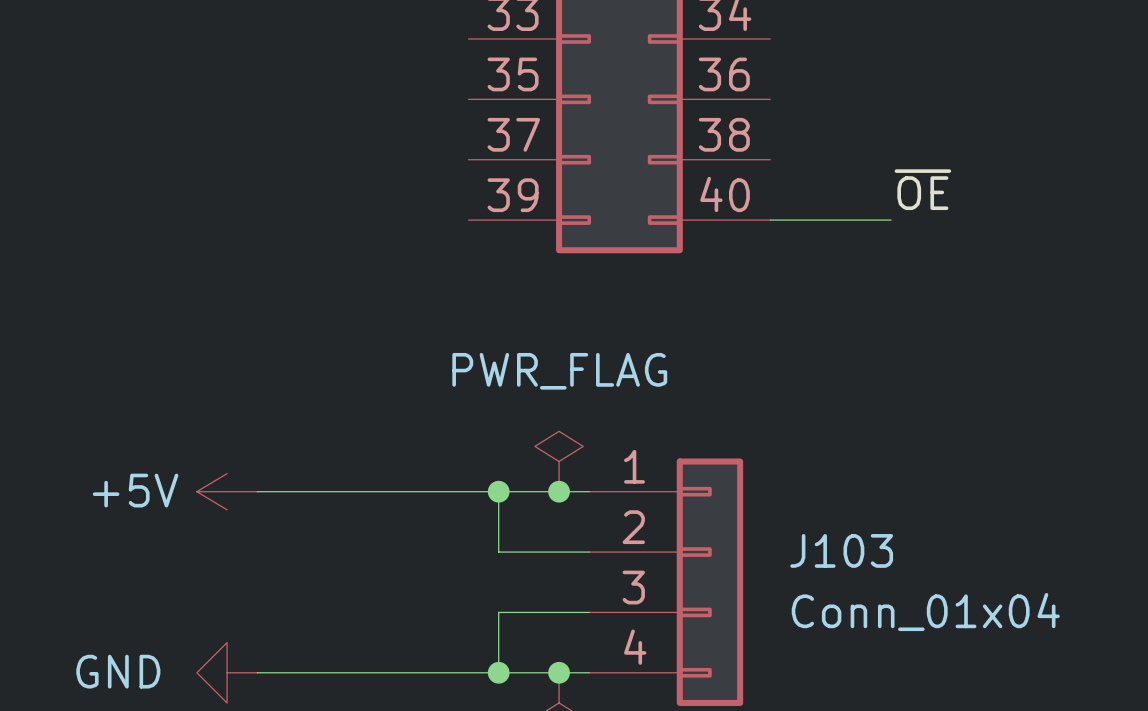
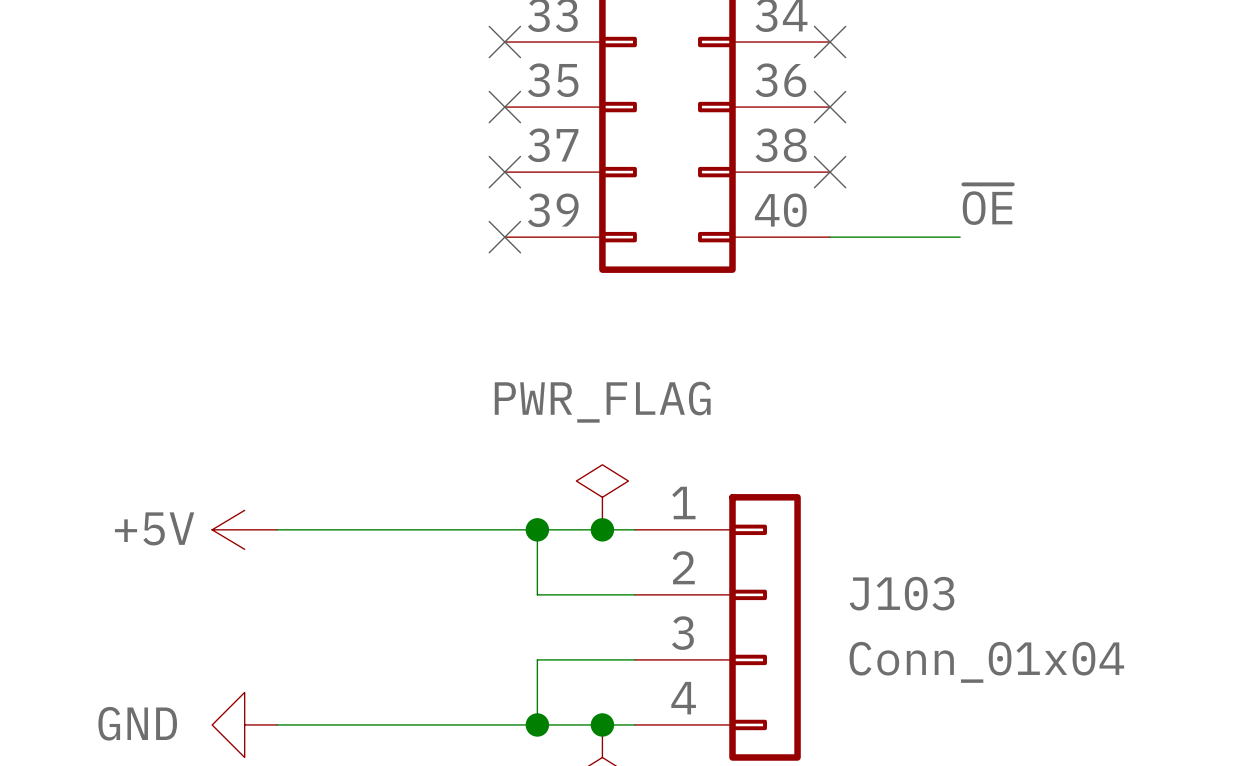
no-connect mark: none -> (504, 42)
no-connect mark: none -> (830, 42)
no-connect mark: none -> (504, 107)
no-connect mark: none -> (830, 107)
no-connect mark: none -> (504, 172)
no-connect mark: none -> (830, 172)
no-connect mark: none -> (504, 237)

